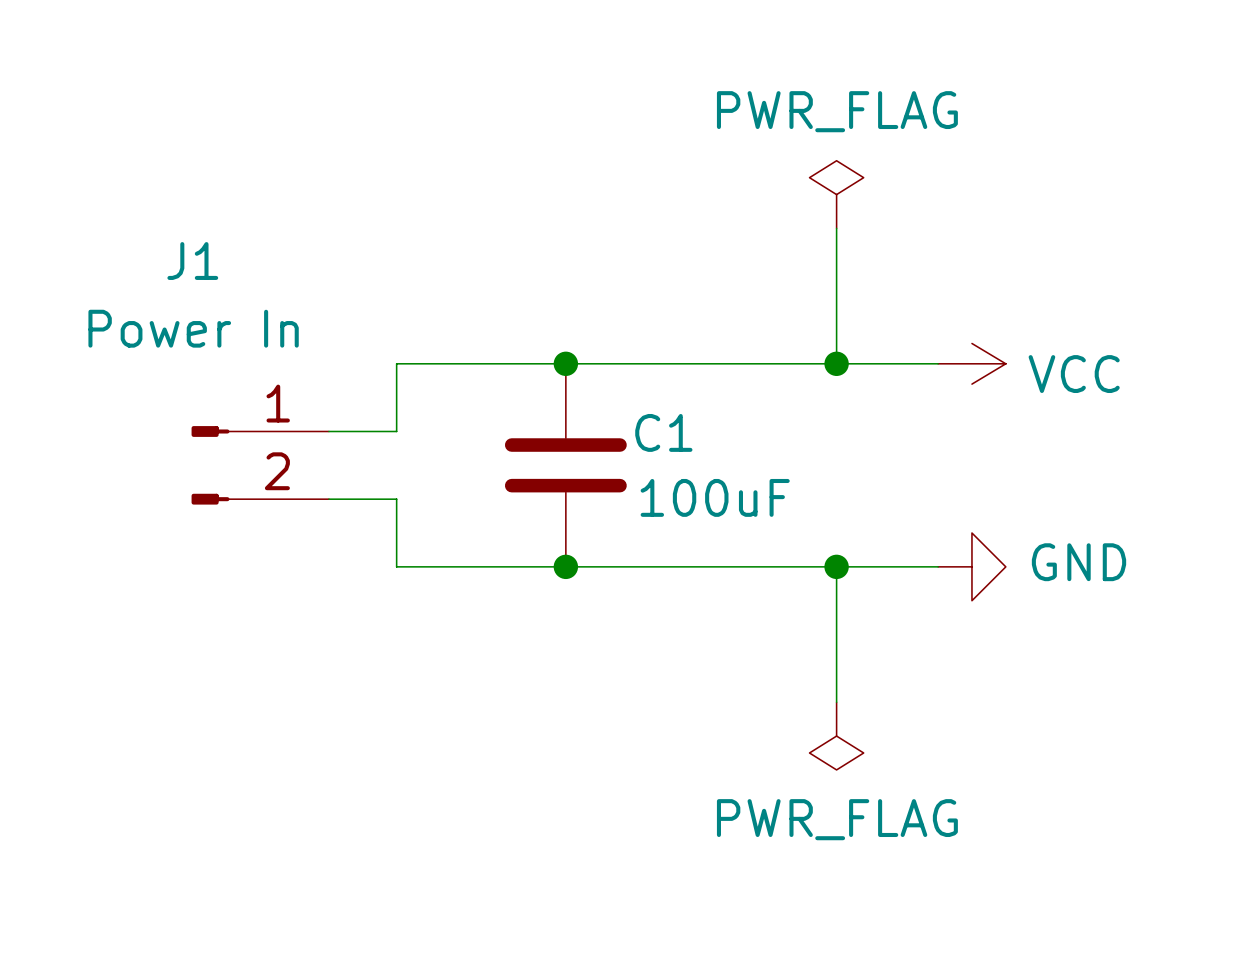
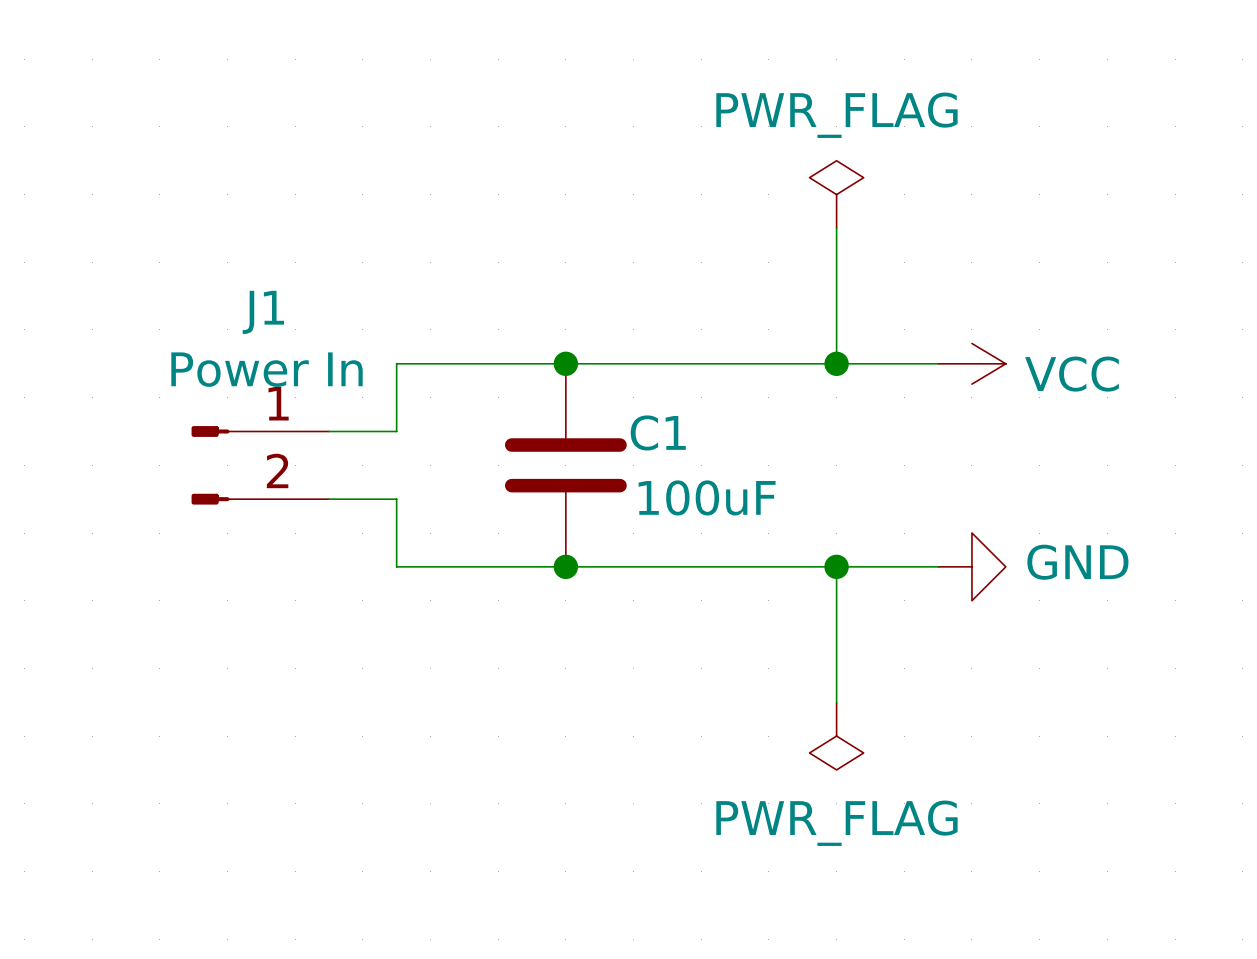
J1 name position: J1 (192, 261) -> J1 (263, 312)
J1 value position: Power In (193, 328) -> Power In (267, 369)

